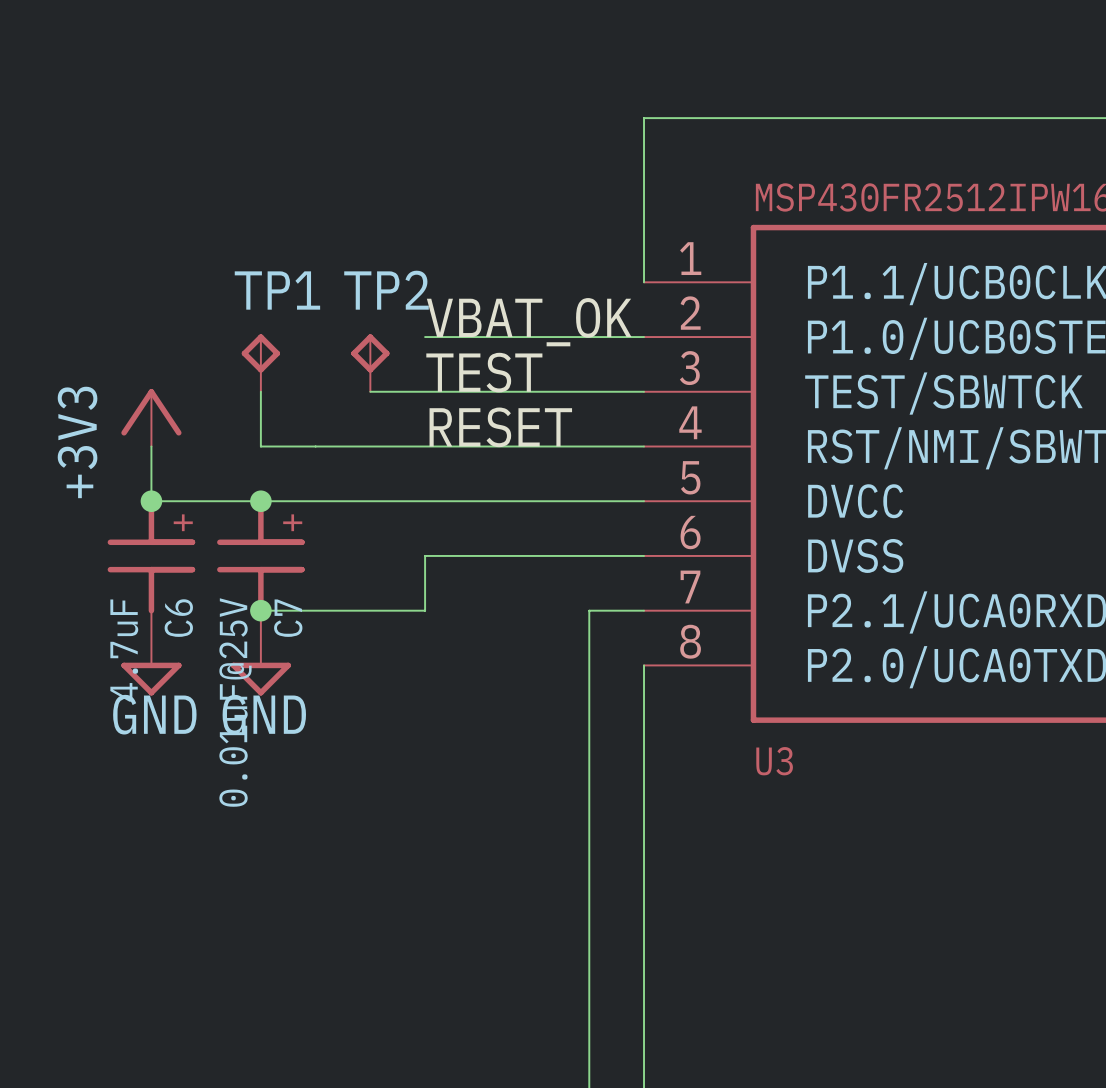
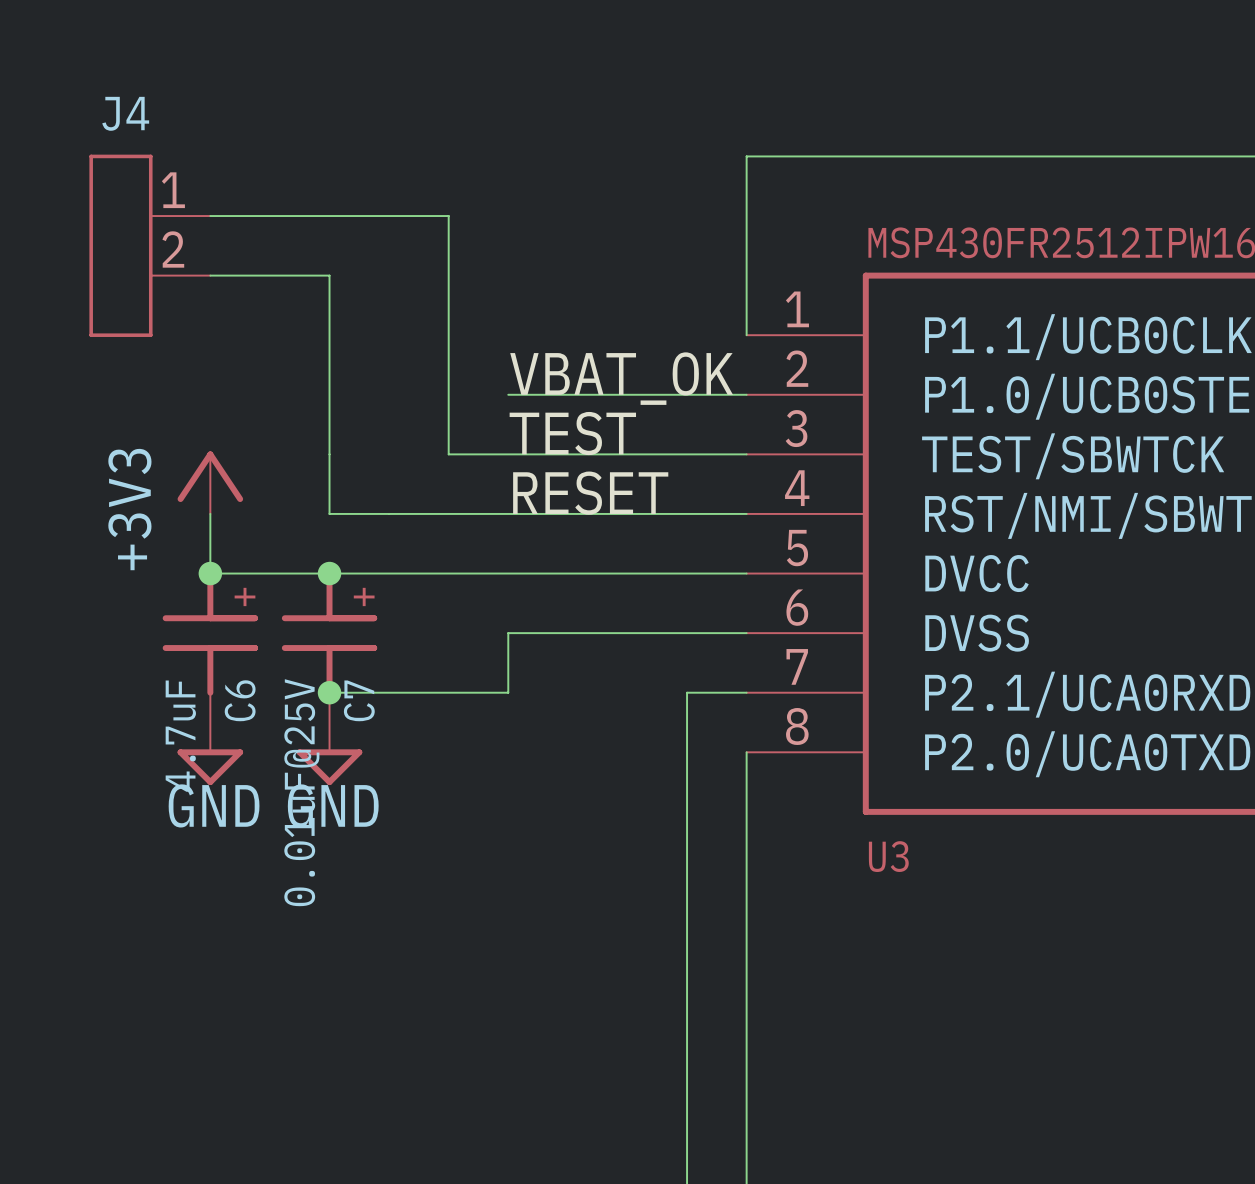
wire: none -> (210, 216) (448, 216) (448, 454)
J4: none -> (149, 245)
wire: none -> (210, 275) (329, 275) (329, 454)
TP1: (260, 363) -> none
TP2: (370, 363) -> none

